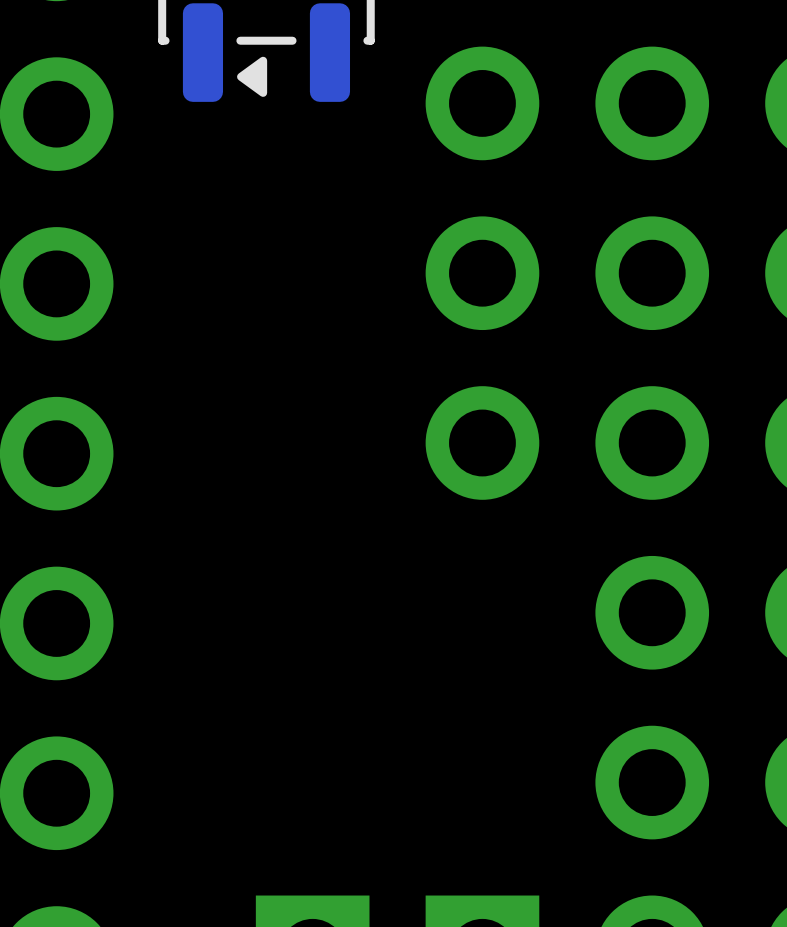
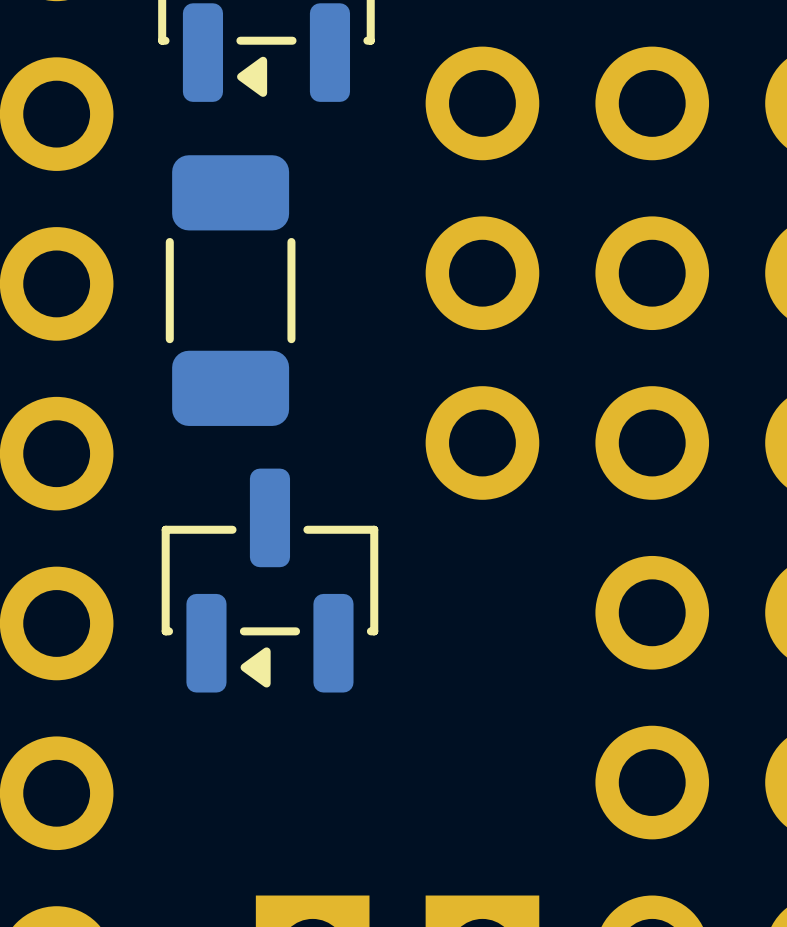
part: none -> (230, 290)
part: none -> (269, 580)

